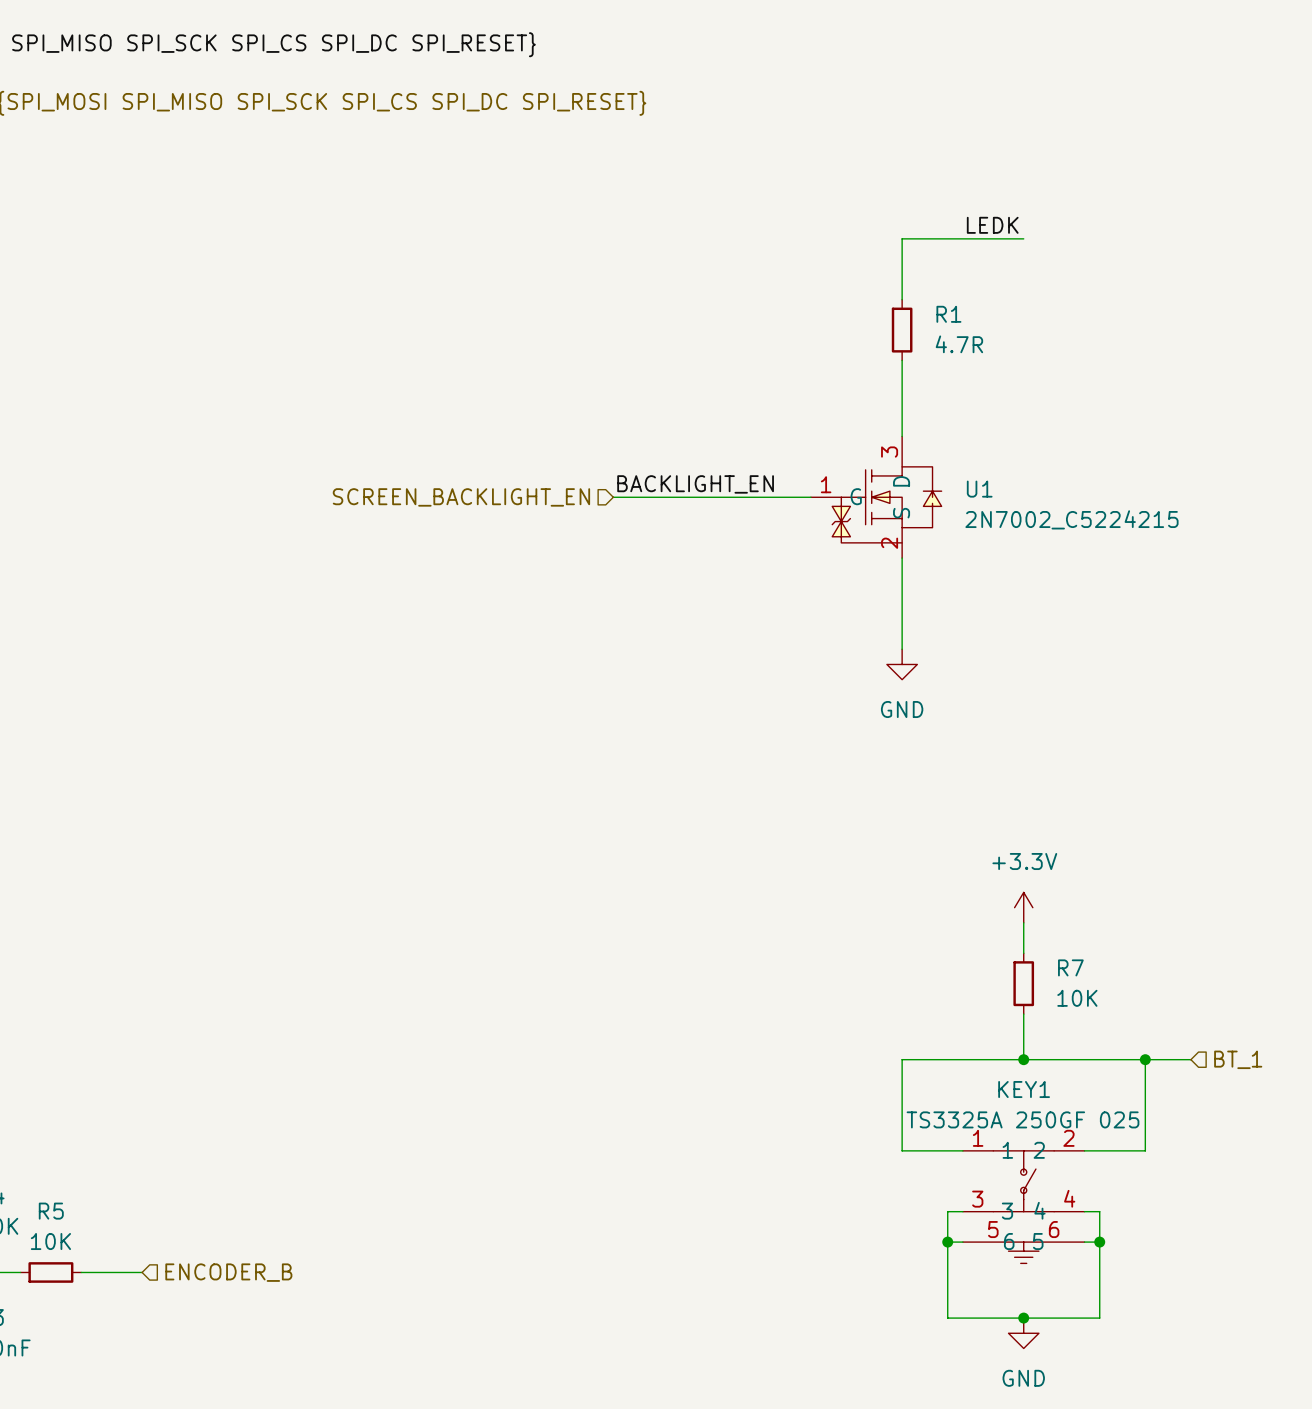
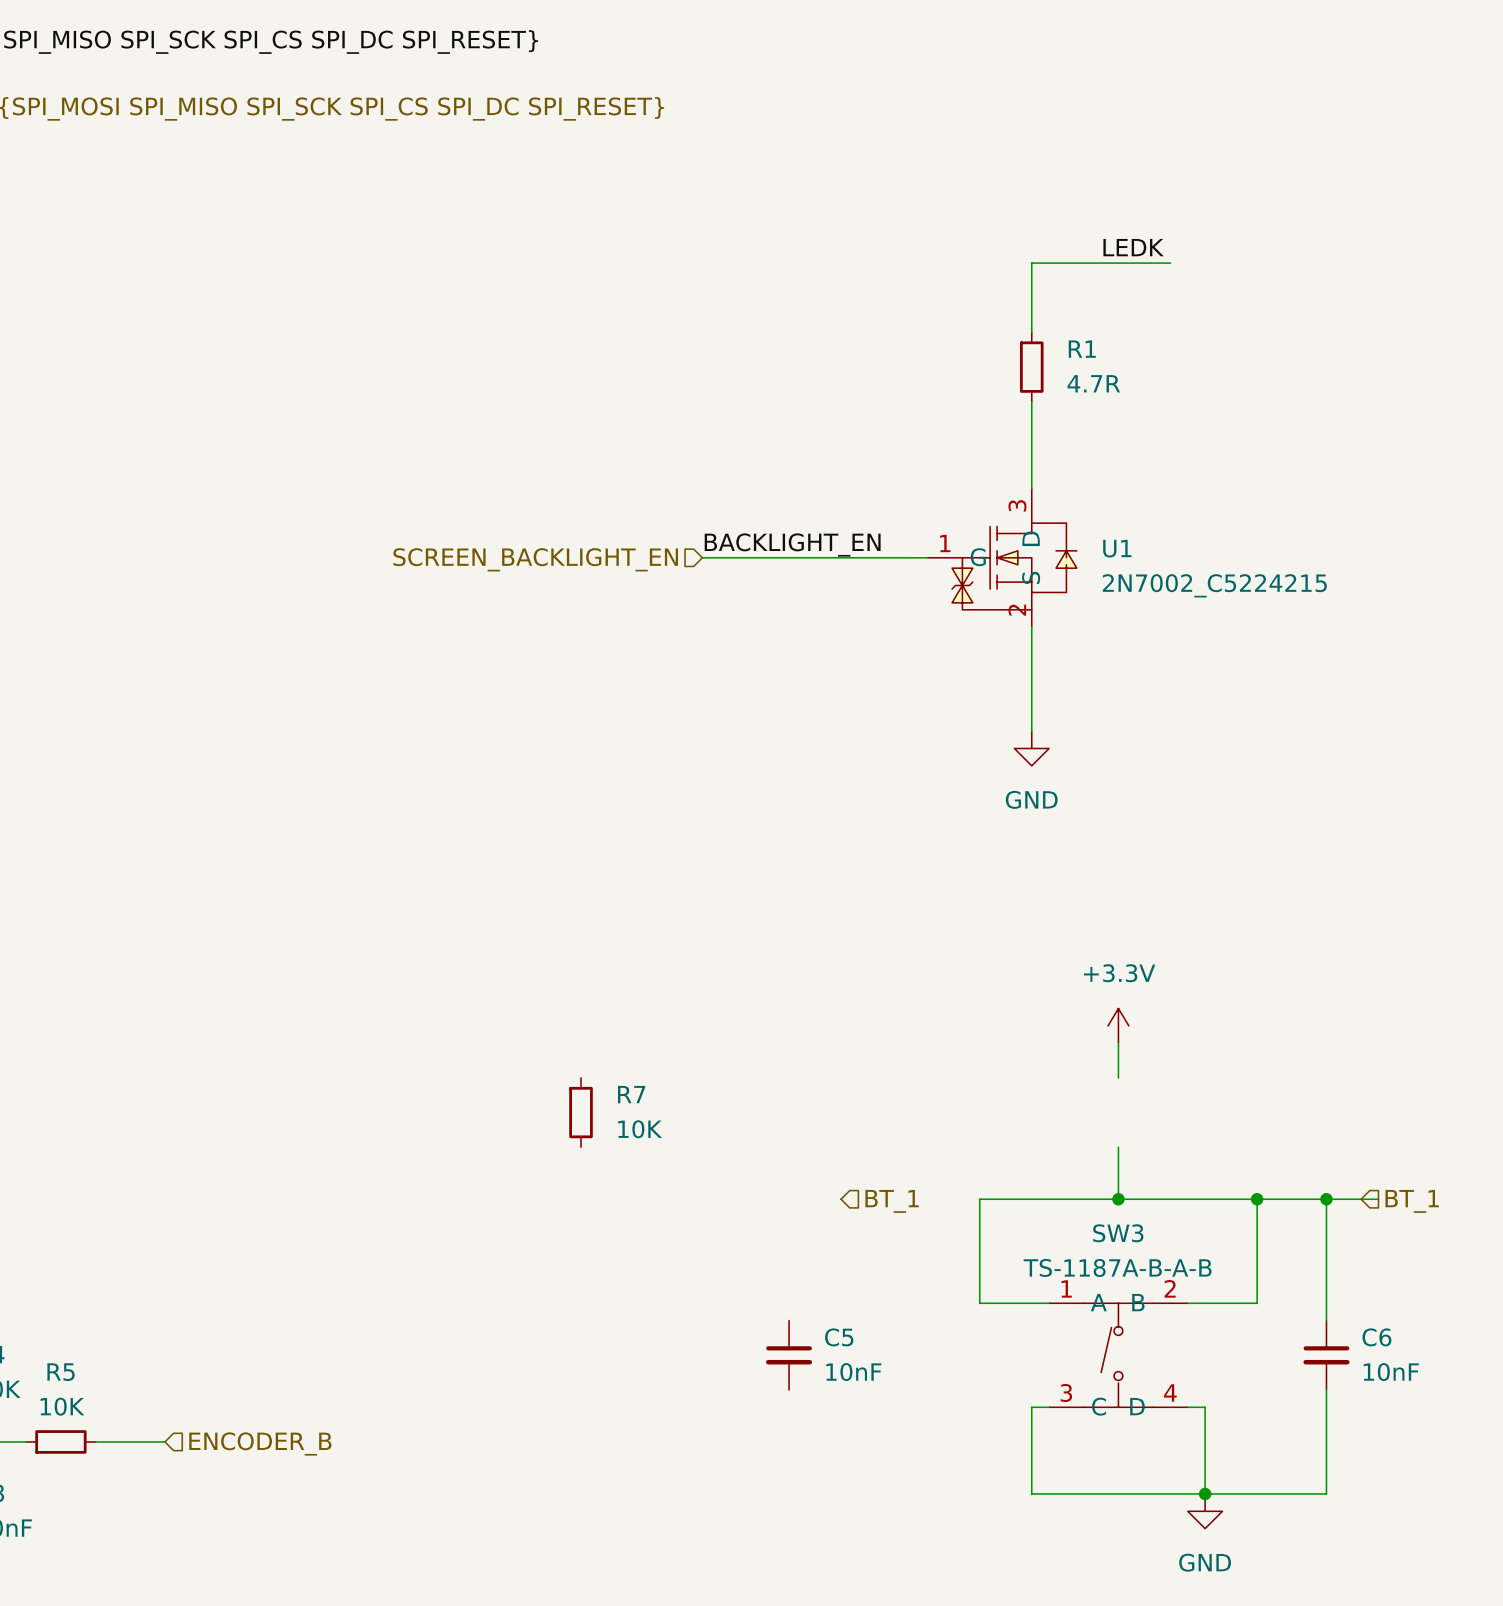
power symbol position: +3.3V (1023, 907) -> +3.3V (1118, 1025)
wire: (1023, 922) (1023, 953) -> (1118, 1043) (1118, 1077)
R7 position: (1023, 983) -> (581, 1112)
wire: (1023, 1014) (1023, 1059) -> (1118, 1147) (1118, 1199)
hierarchical label: none -> BT_1 (892, 1201)
wire: (902, 1059) (902, 1150) -> (1031, 1199) (979, 1199) (979, 1303) (1031, 1303)
junction: none -> (1118, 1199)
junction: (1023, 1059) -> none
junction: none -> (1257, 1199)
wire: (1145, 1059) (1145, 1150) (1099, 1150) -> (1257, 1199) (1257, 1303)
junction position: (1145, 1059) -> (1326, 1199)
wire: none -> (1326, 1199) (1326, 1320)
C5: none -> 10nF (789, 1355)
SW3: none -> TS-1187A-B-A-B (1118, 1355)
C6: none -> 10nF (1326, 1355)
KEY1: TS3325A 250GF 025 (1023, 1207) -> none
wire: (962, 1211) (947, 1211) (947, 1318) -> (1049, 1407) (1031, 1407) (1031, 1493) (1083, 1493)
wire: (1084, 1211) (1099, 1211) (1099, 1318) -> (1326, 1389) (1326, 1493) (1257, 1493)
junction: (947, 1242) -> none
wire: none -> (1187, 1407) (1205, 1407) (1205, 1493)
wire: (1084, 1242) (1099, 1242) -> (1361, 1199) (1378, 1199)
junction: (1099, 1242) -> none
junction position: (1023, 1318) -> (1205, 1493)
power symbol position: GND (1023, 1333) -> GND (1205, 1511)

